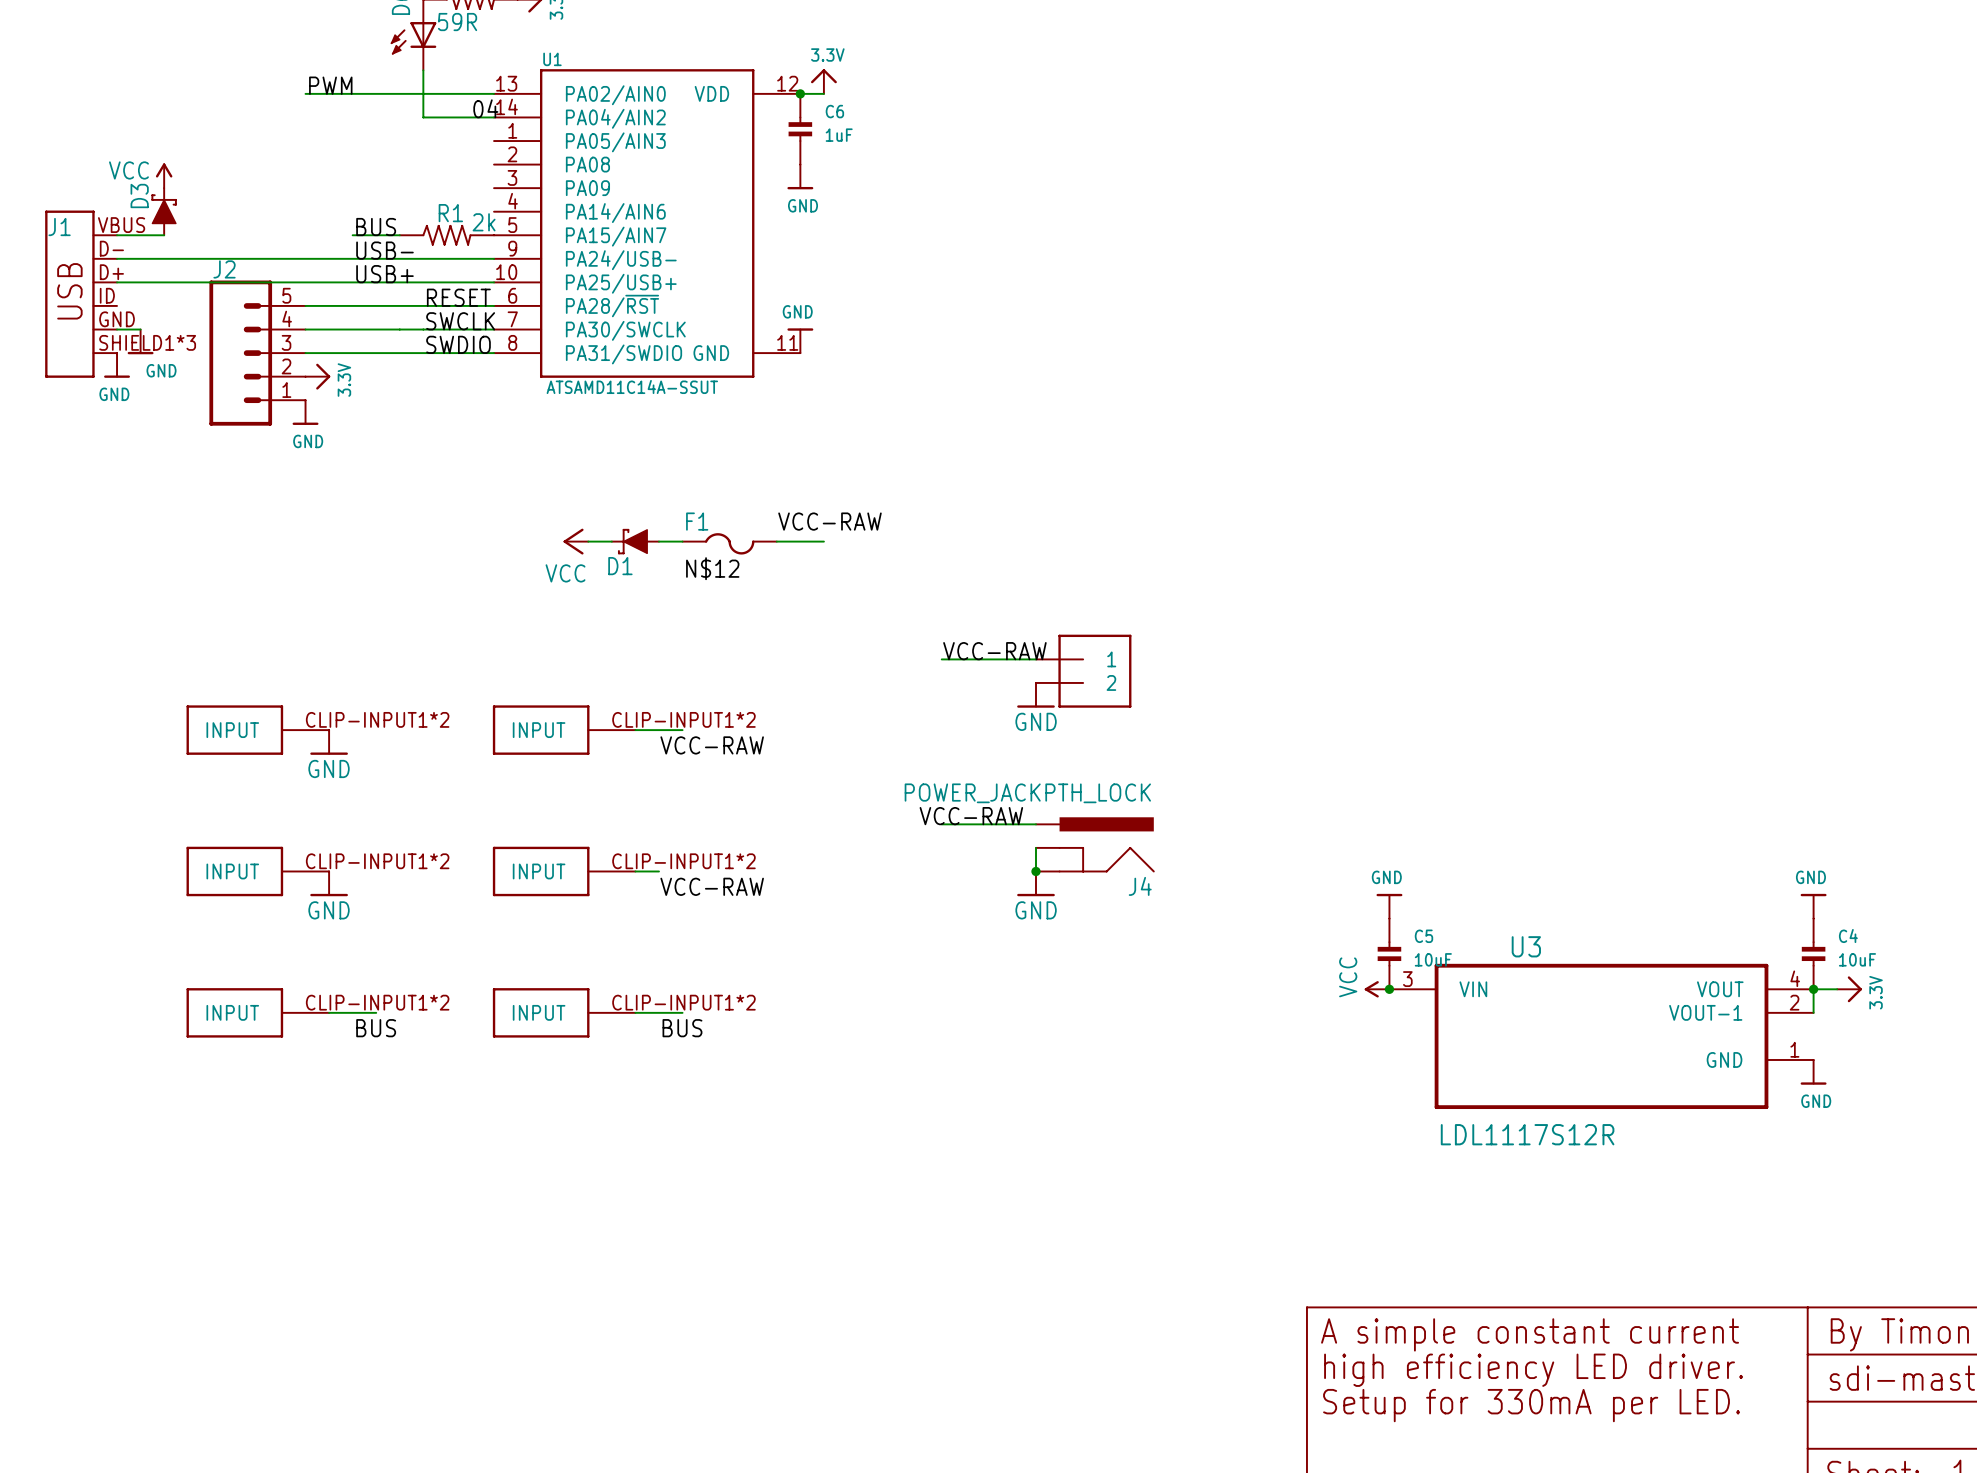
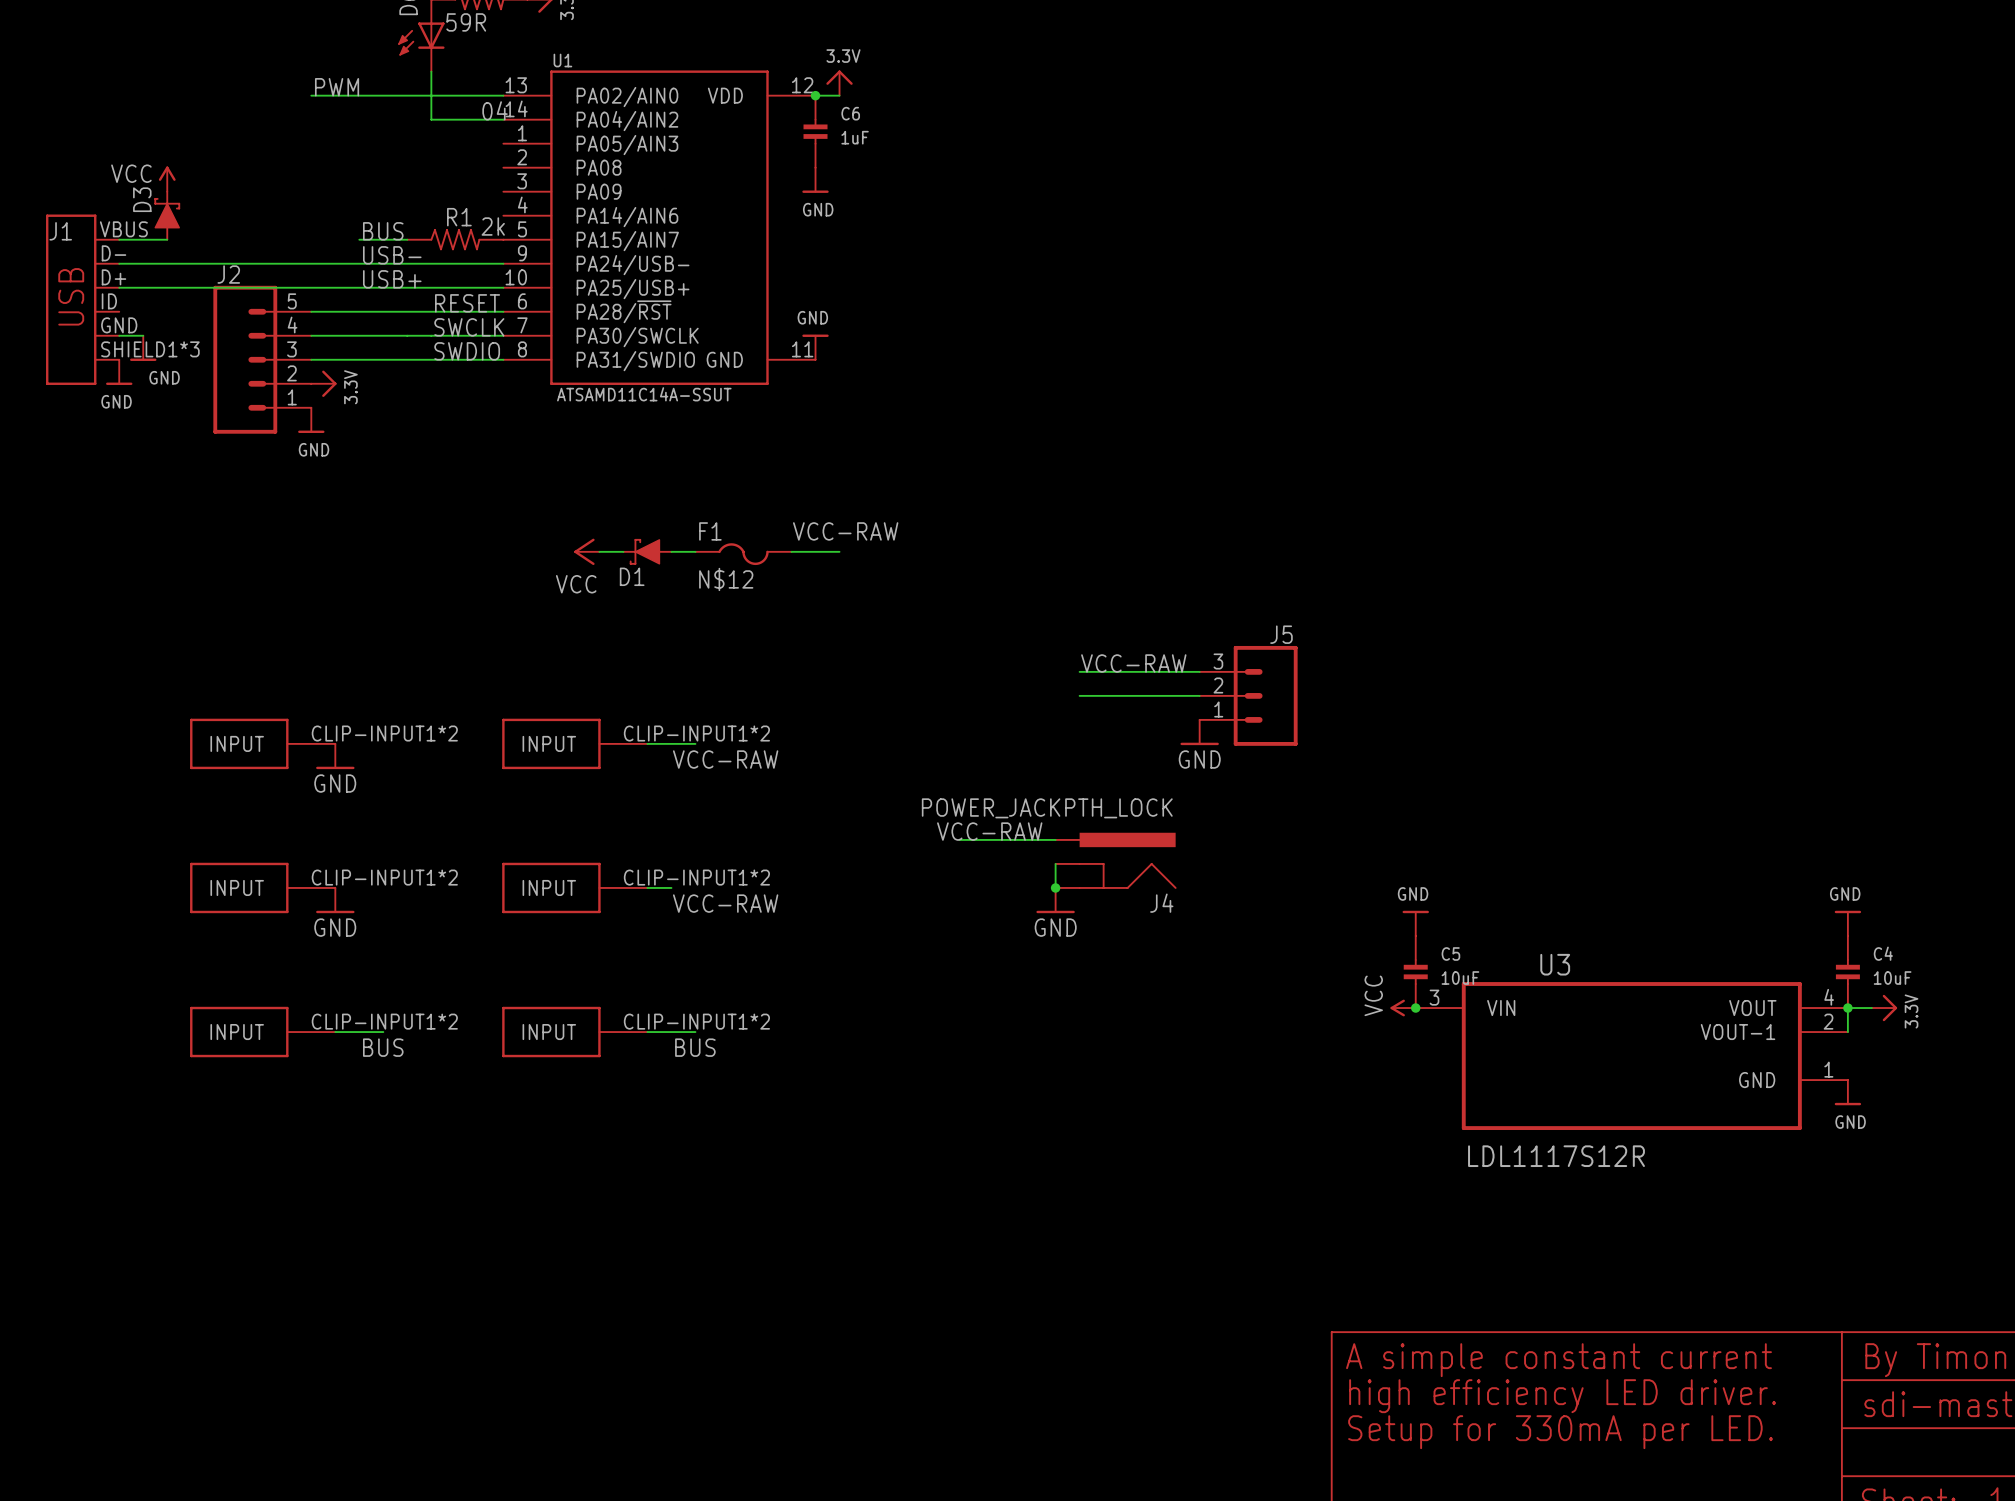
label position: VCC-RAW (994, 651) -> VCC-RAW (1133, 663)
wire: (941, 659) (1036, 659) -> none
wire: none -> (1079, 671) (1199, 671)
part: (1083, 671) -> none
wire: none -> (1079, 695) (1199, 695)
J5: none -> (1248, 695)
power symbol position: GND (1036, 695) -> GND (1199, 732)

